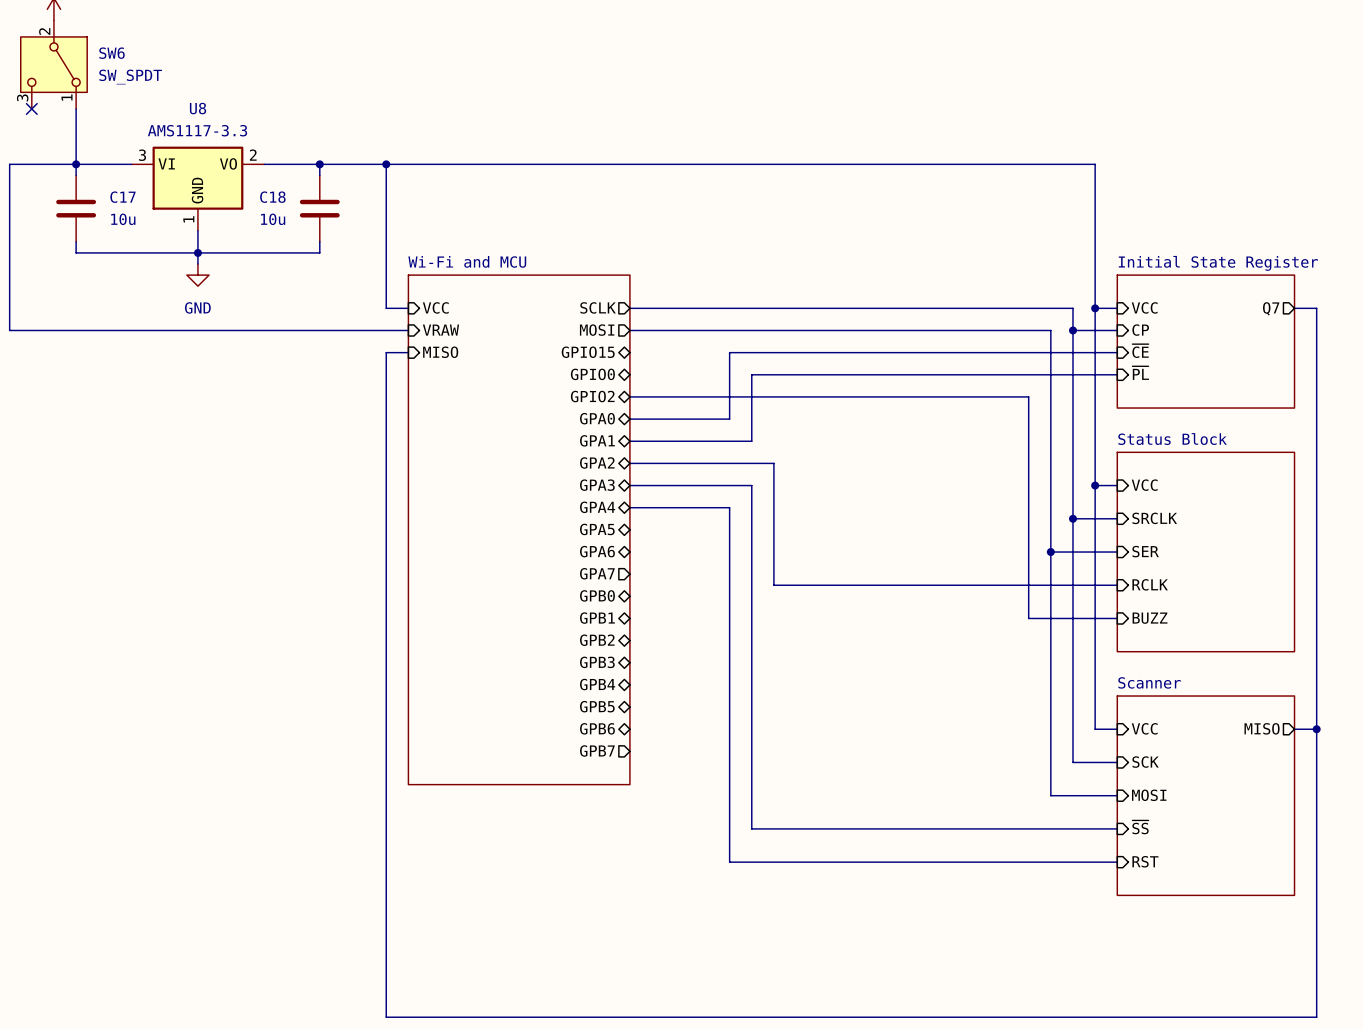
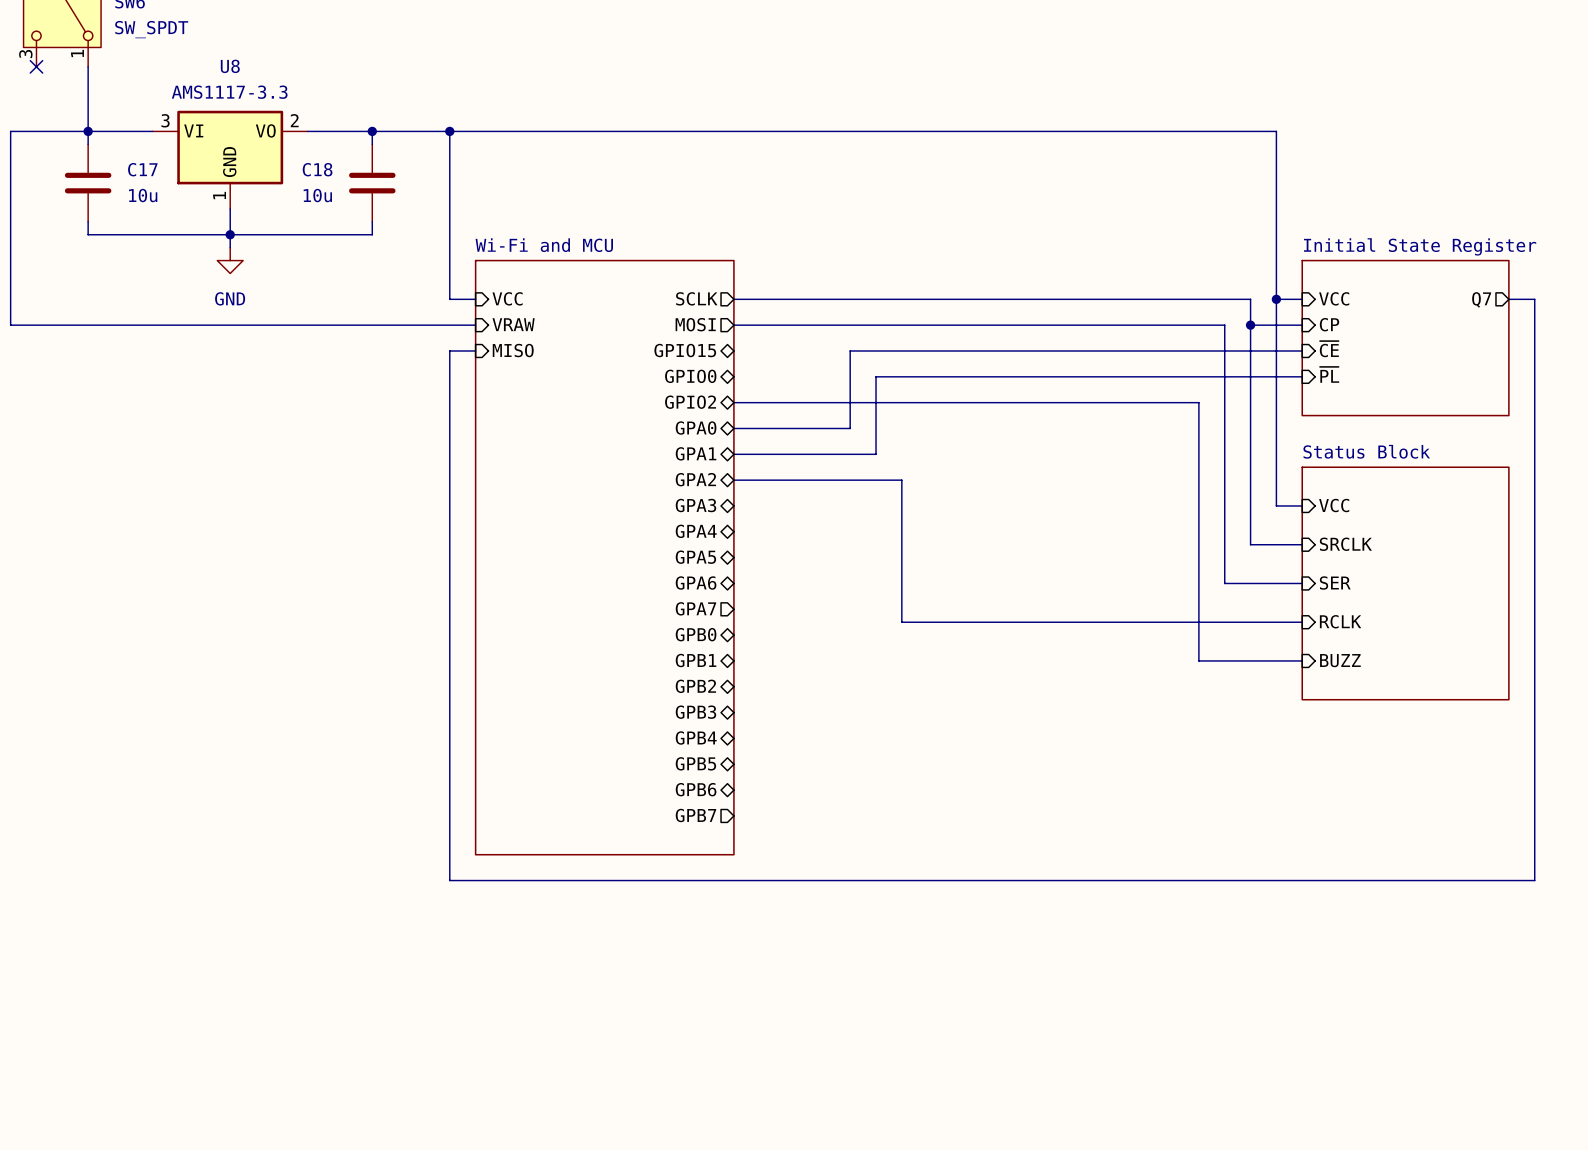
wire: (629, 485) (751, 485) (751, 828) (1117, 828) -> none
wire: (1095, 485) (1095, 729) (1117, 729) -> none
junction: (1095, 485) -> none
wire: (629, 507) (729, 507) (729, 862) (1117, 862) -> none
wire: (1072, 518) (1072, 762) (1117, 762) -> none
junction: (1072, 518) -> none
wire: (1050, 552) (1050, 795) (1117, 795) -> none
junction: (1050, 552) -> none
sheet pin: VCC (1144, 728) -> none
sheet pin: MISO (1262, 728) -> none
wire: (1294, 729) (1316, 729) -> none
junction: (1316, 729) -> none
sheet pin: SCK (1145, 762) -> none
sheet pin: MOSI (1149, 795) -> none
sheet Scanner: (1205, 795) -> none
wire: (386, 806) (386, 1017) (1316, 1017) (1316, 806) -> (449, 880) (1534, 880)
sheet pin: ~{SS} (1140, 827) -> none
sheet pin: RST (1145, 861) -> none

